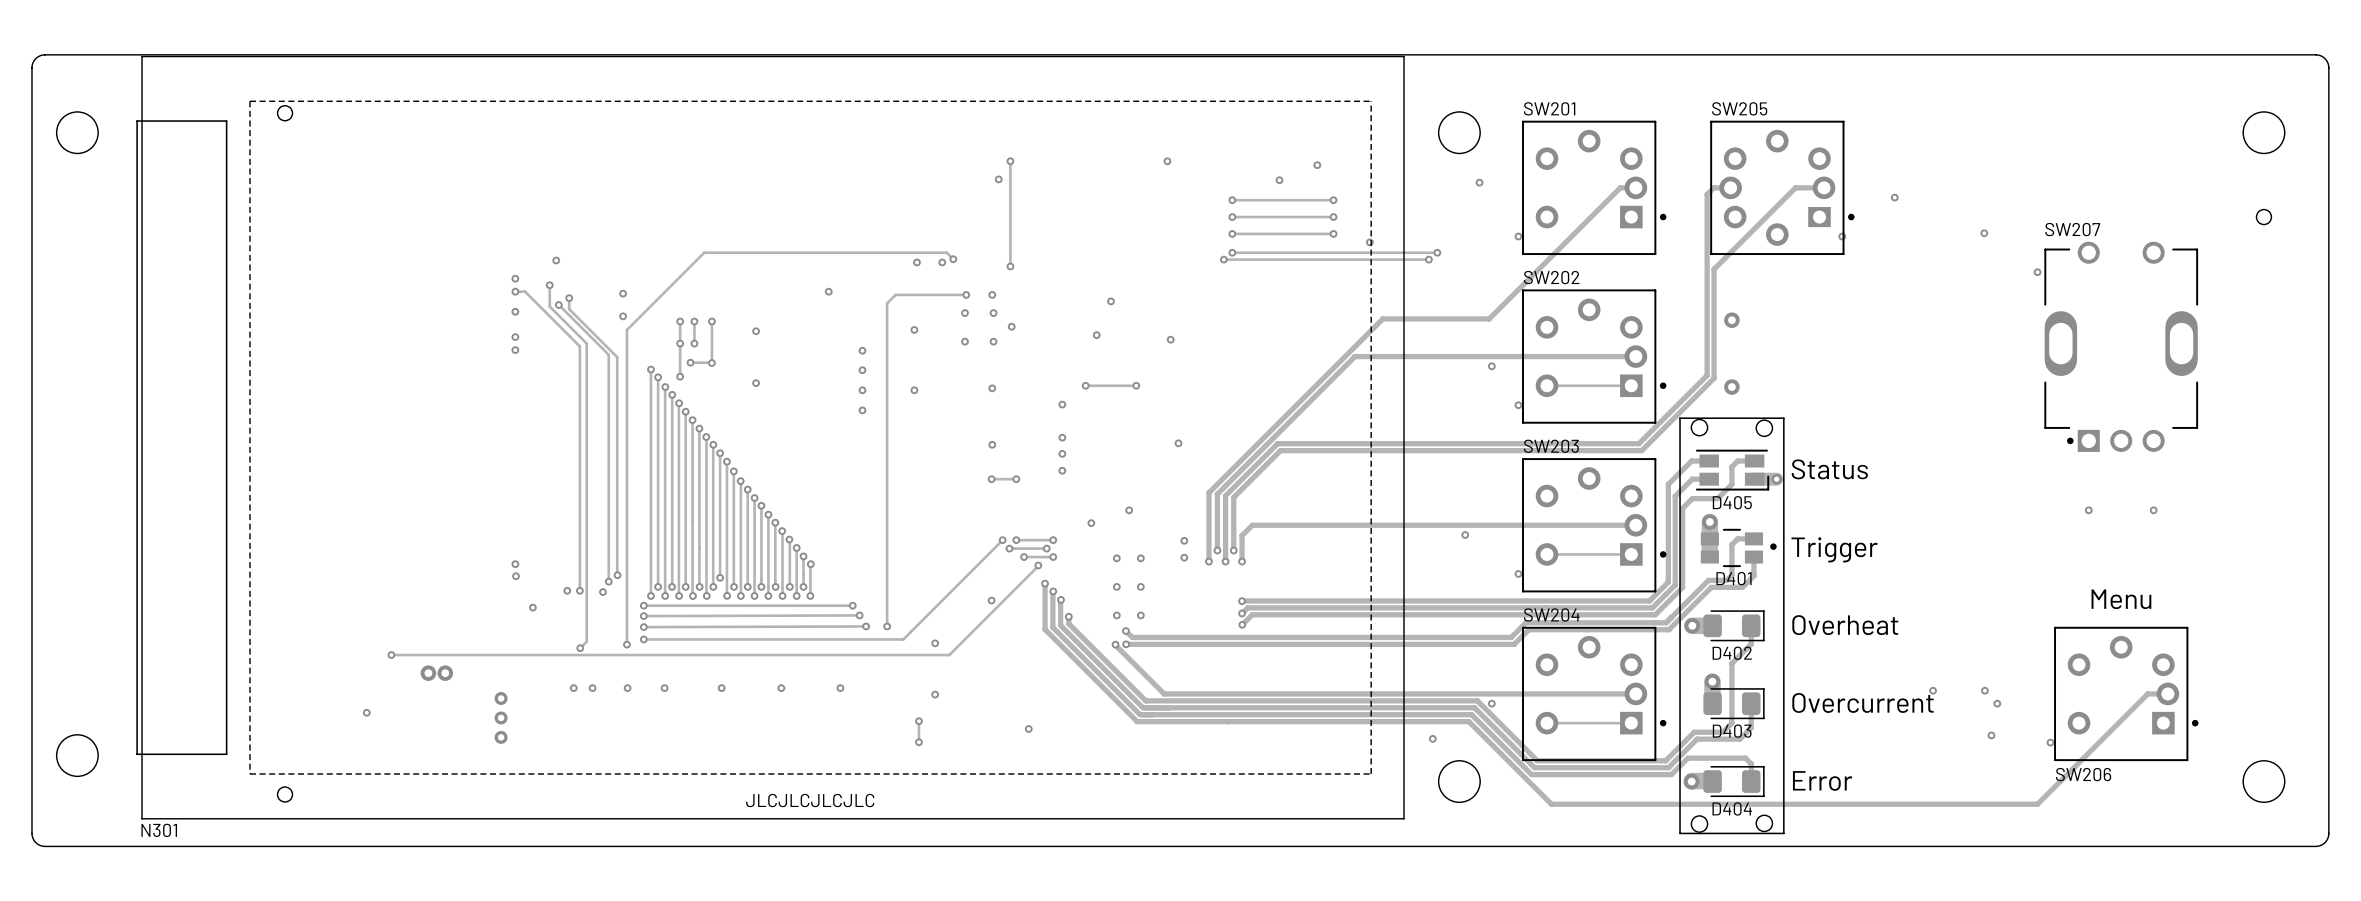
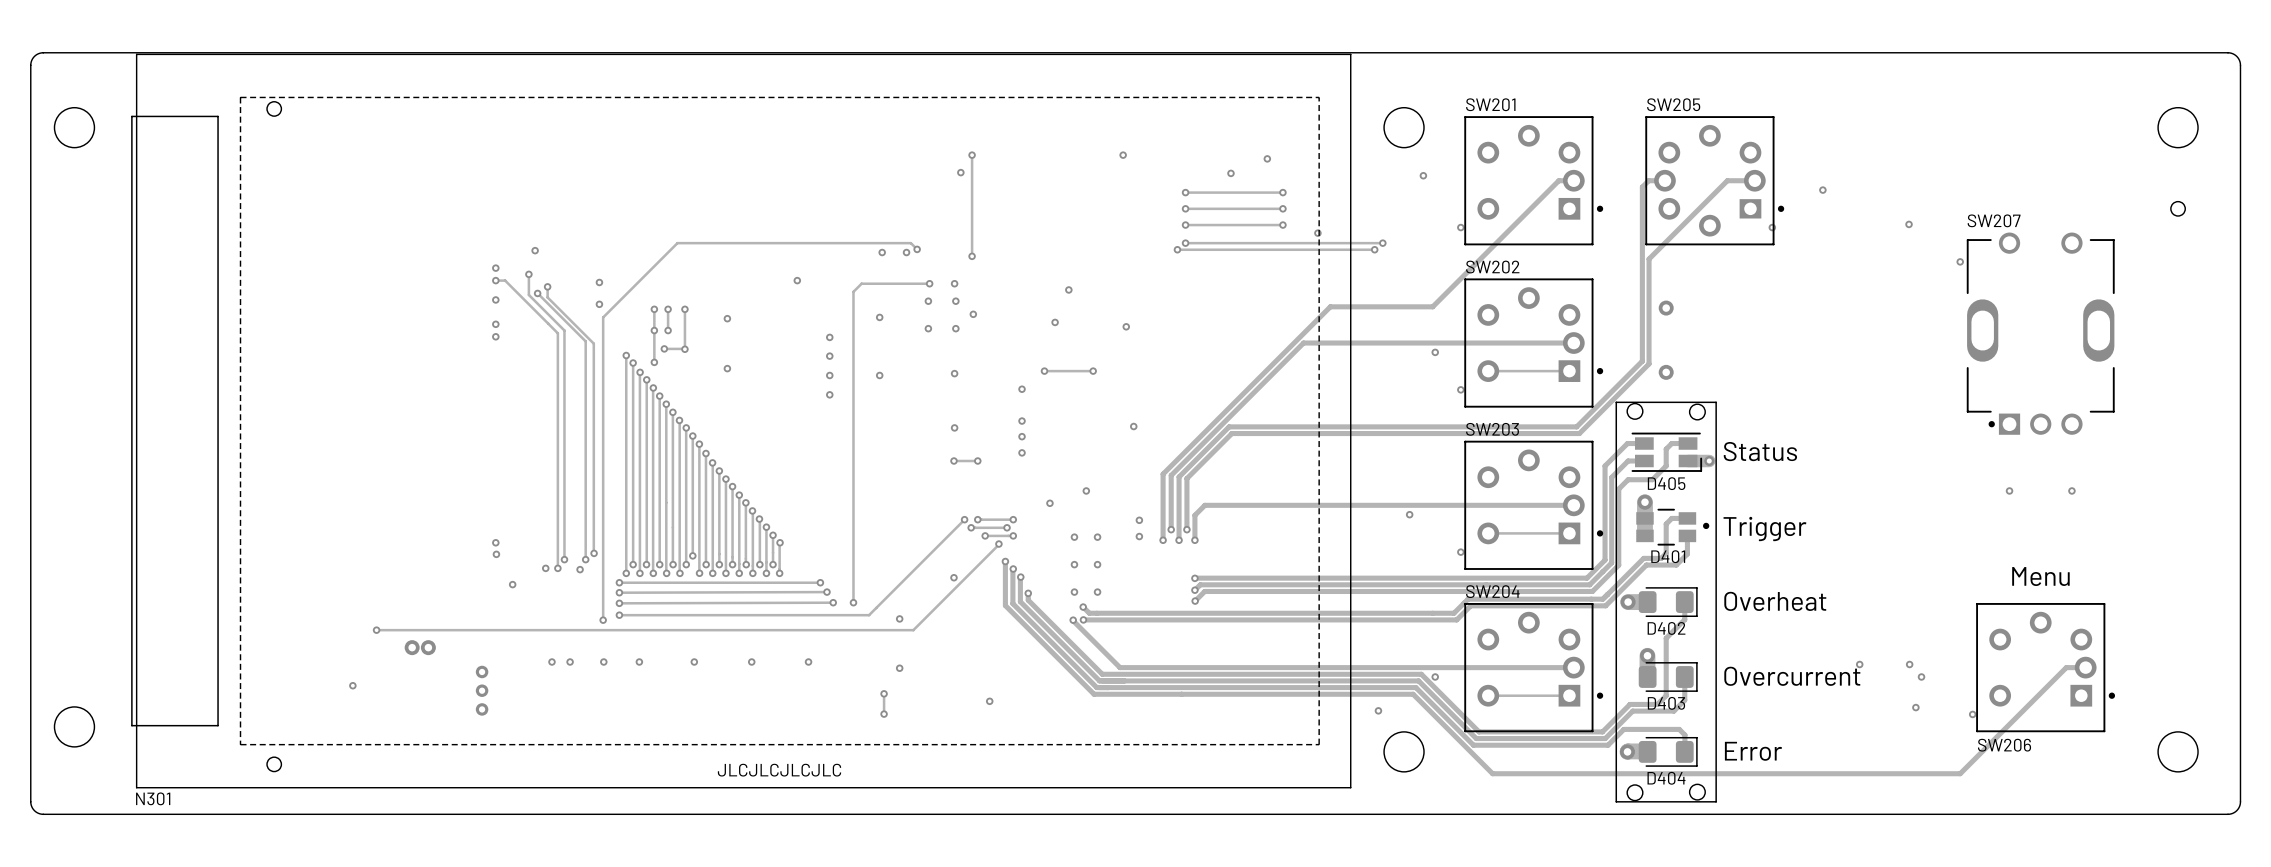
track: (586, 581) (586, 641) (580, 648) -> none
via position: (580, 648) -> (564, 559)

